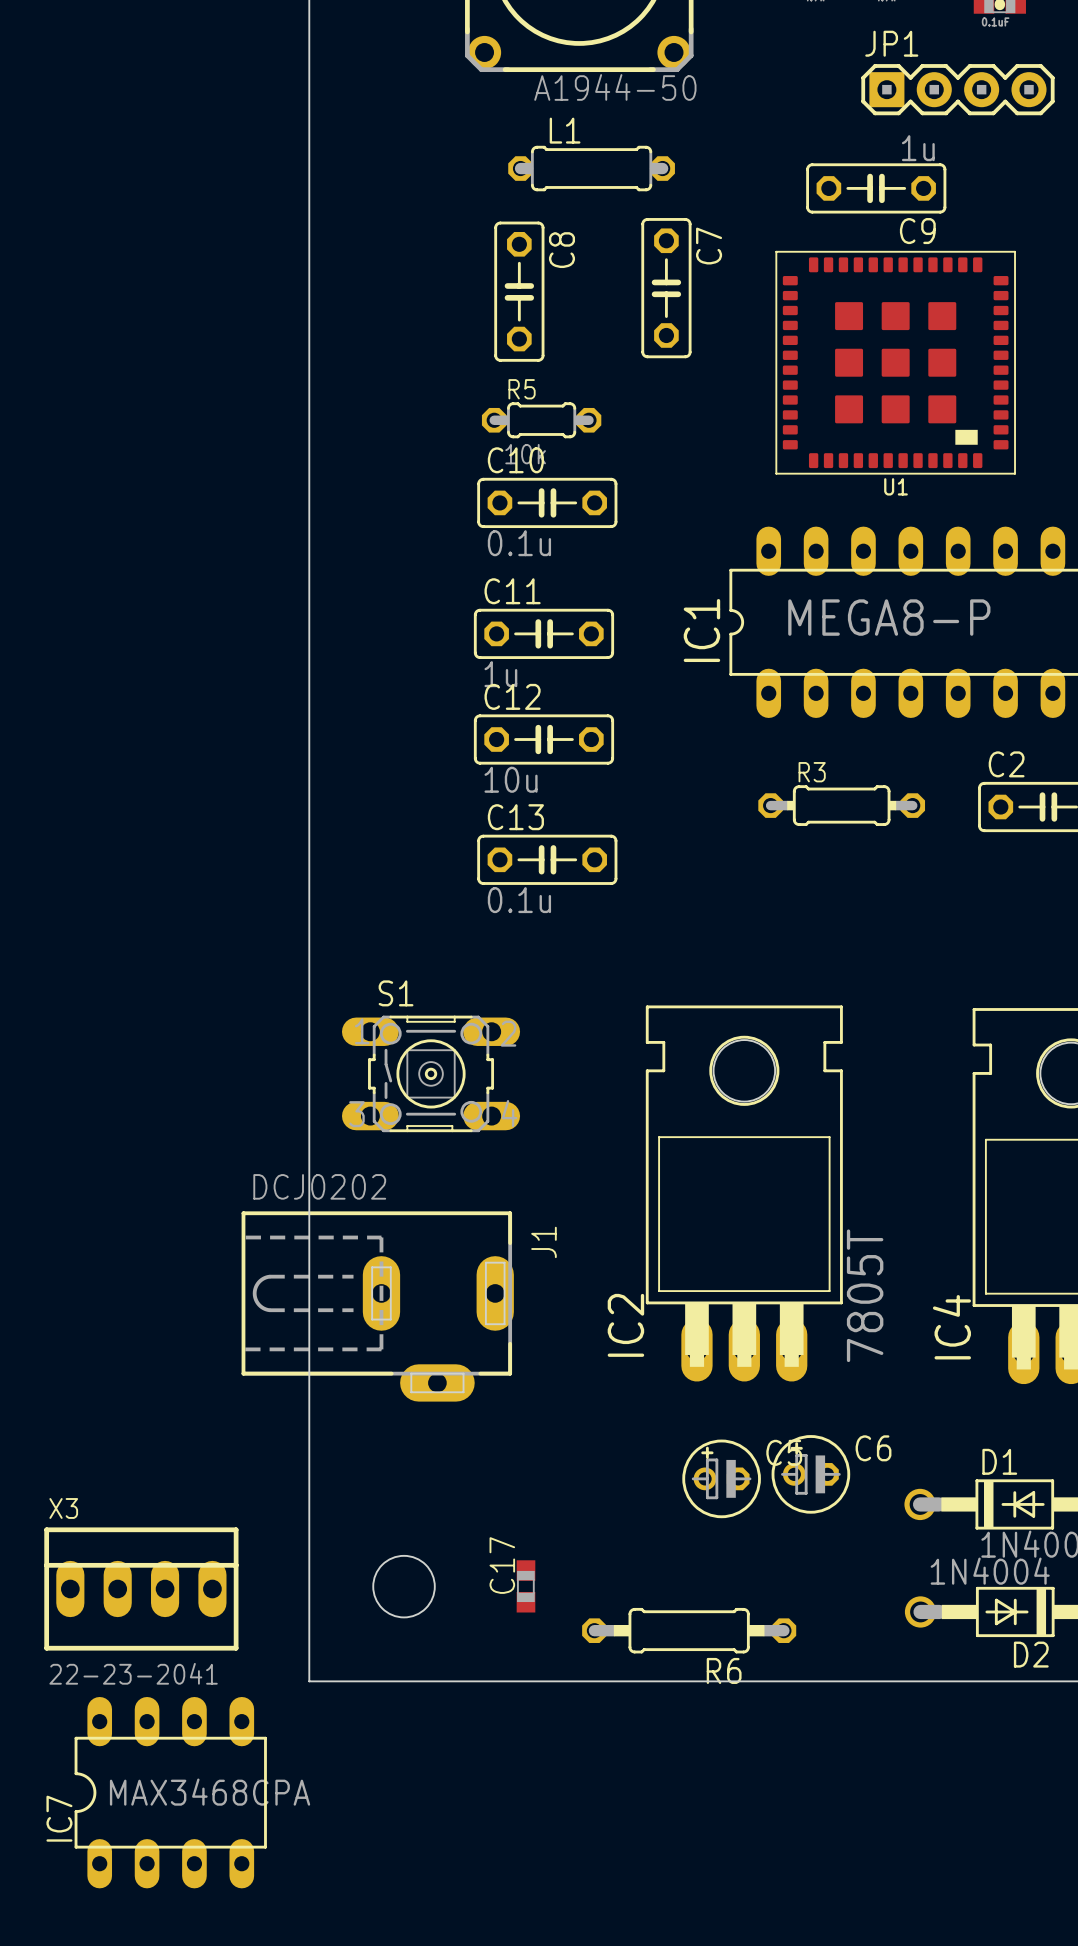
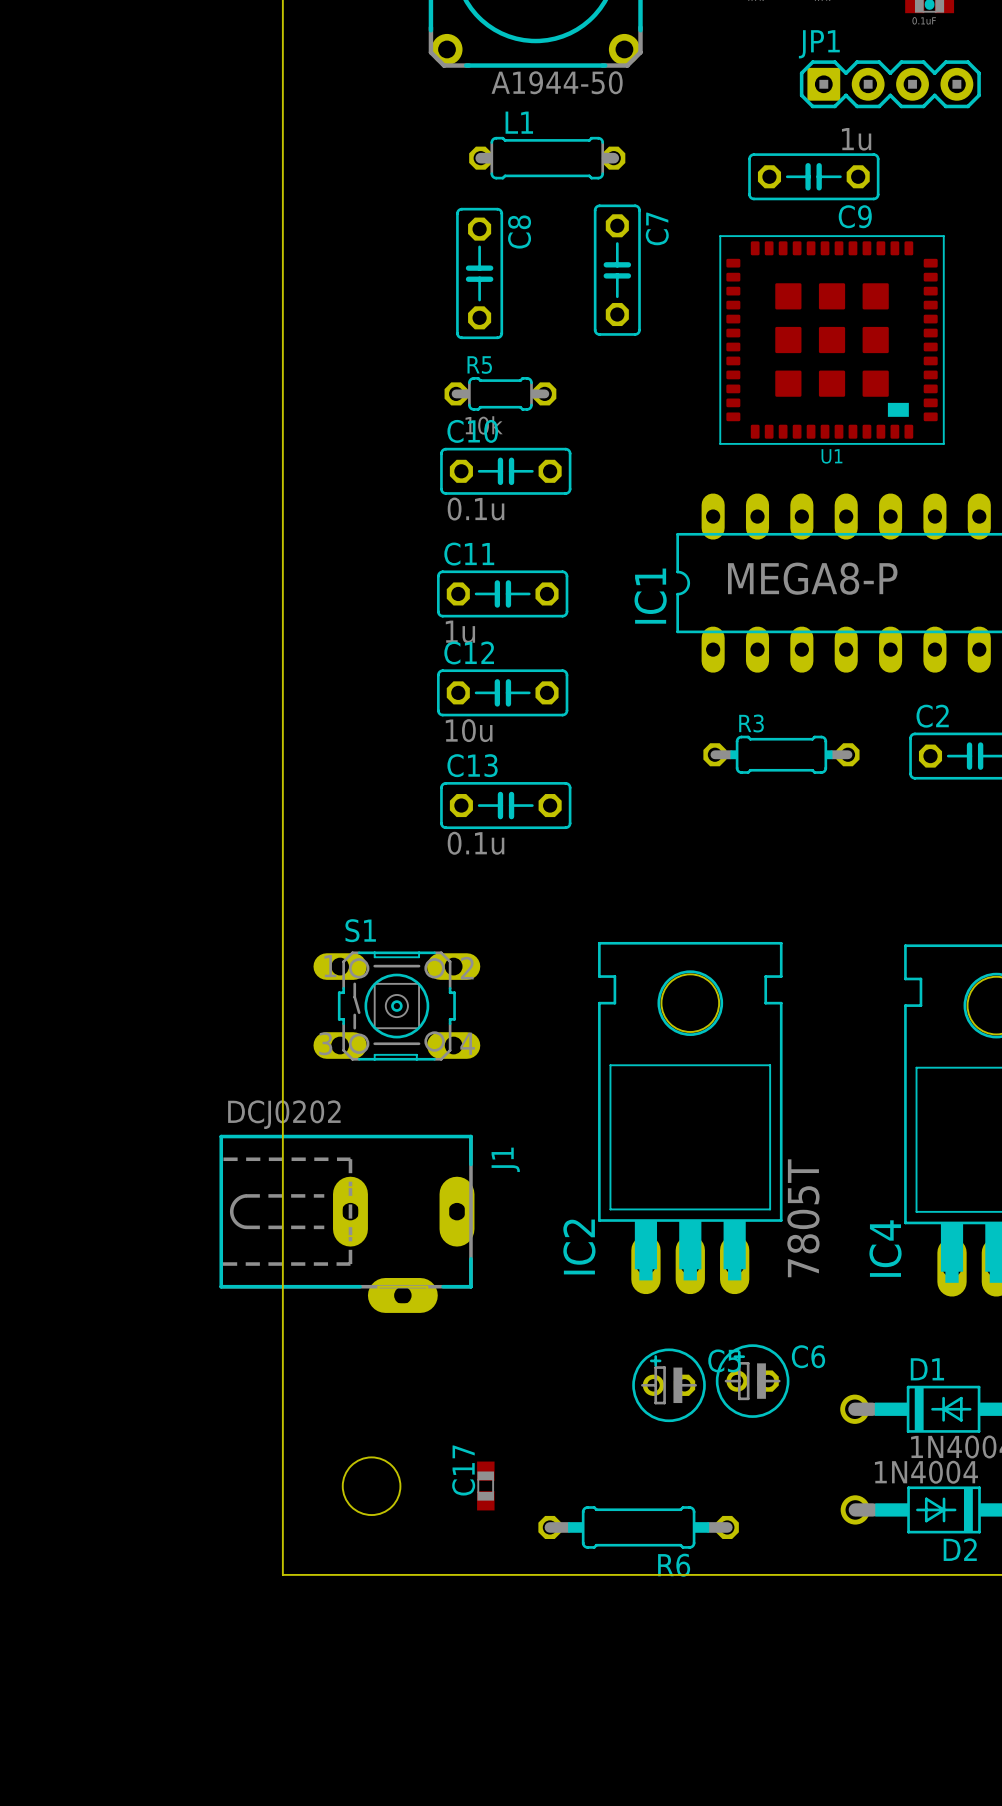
X3: 22-23-2041 (141, 1589) -> none
IC7: MAX3468CPA (170, 1792) -> none

